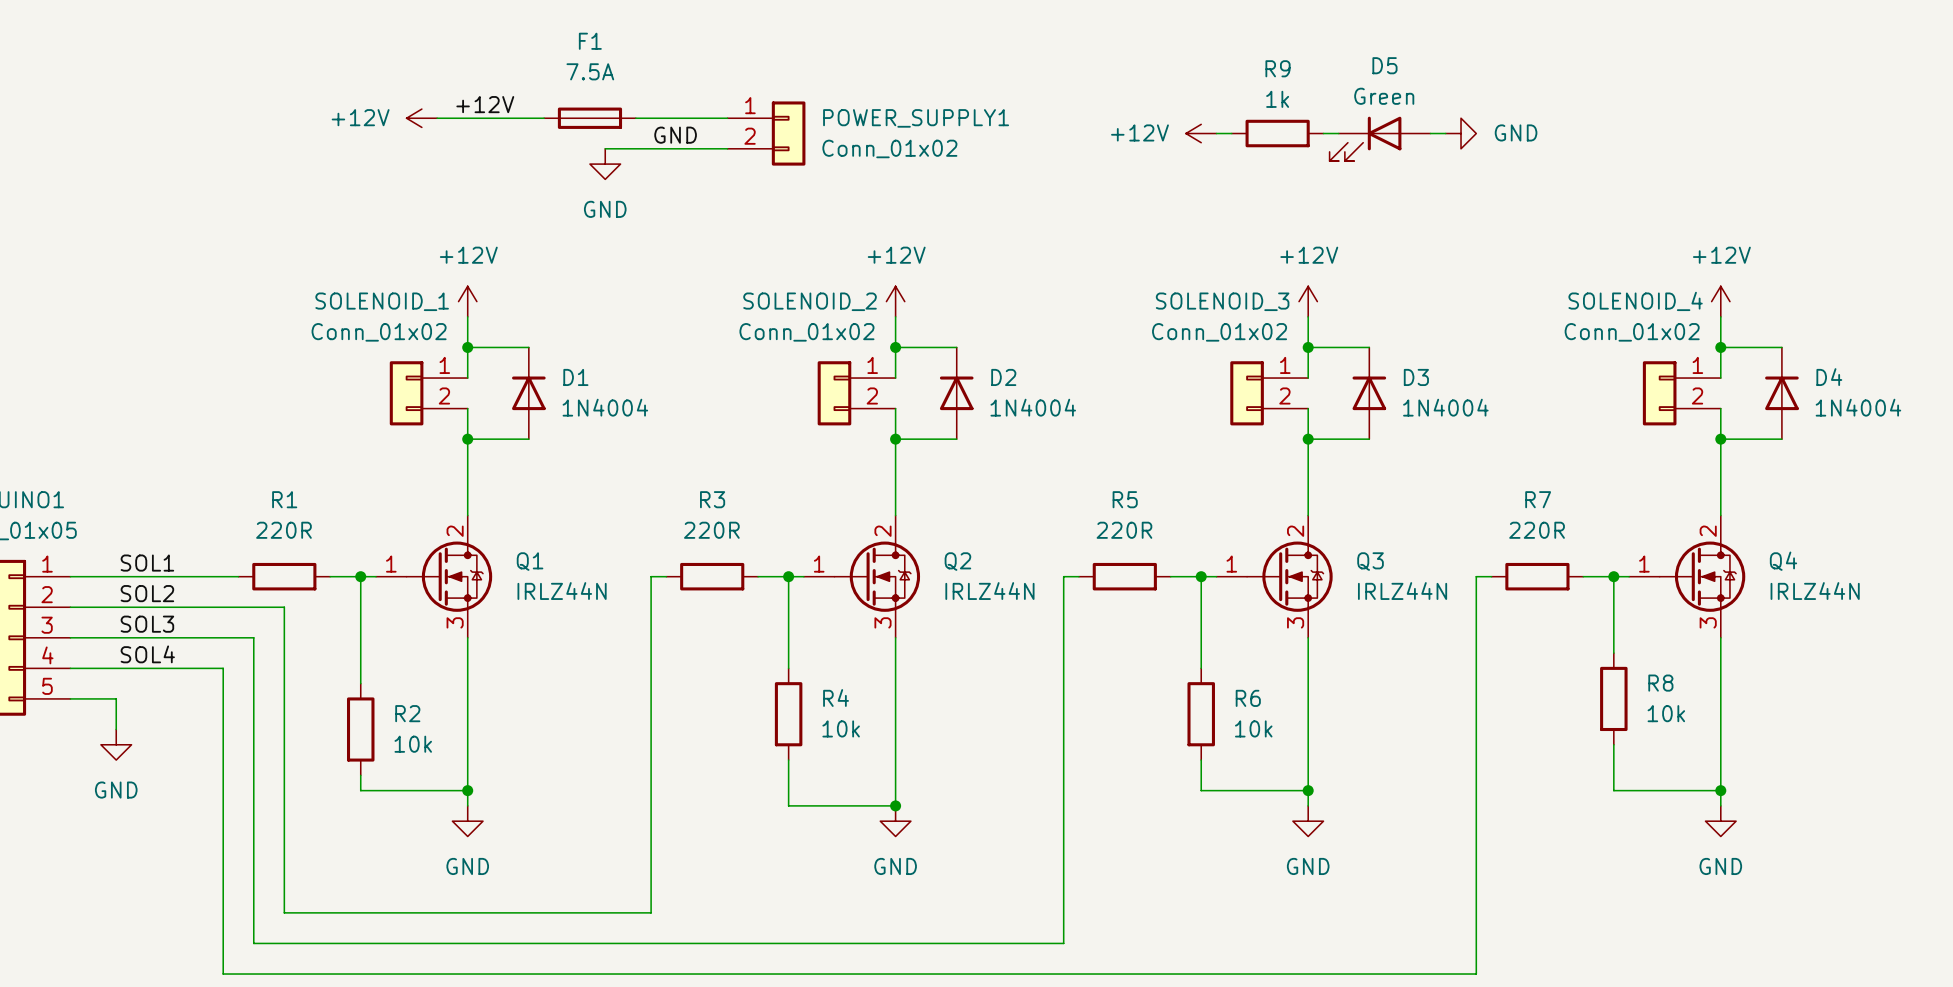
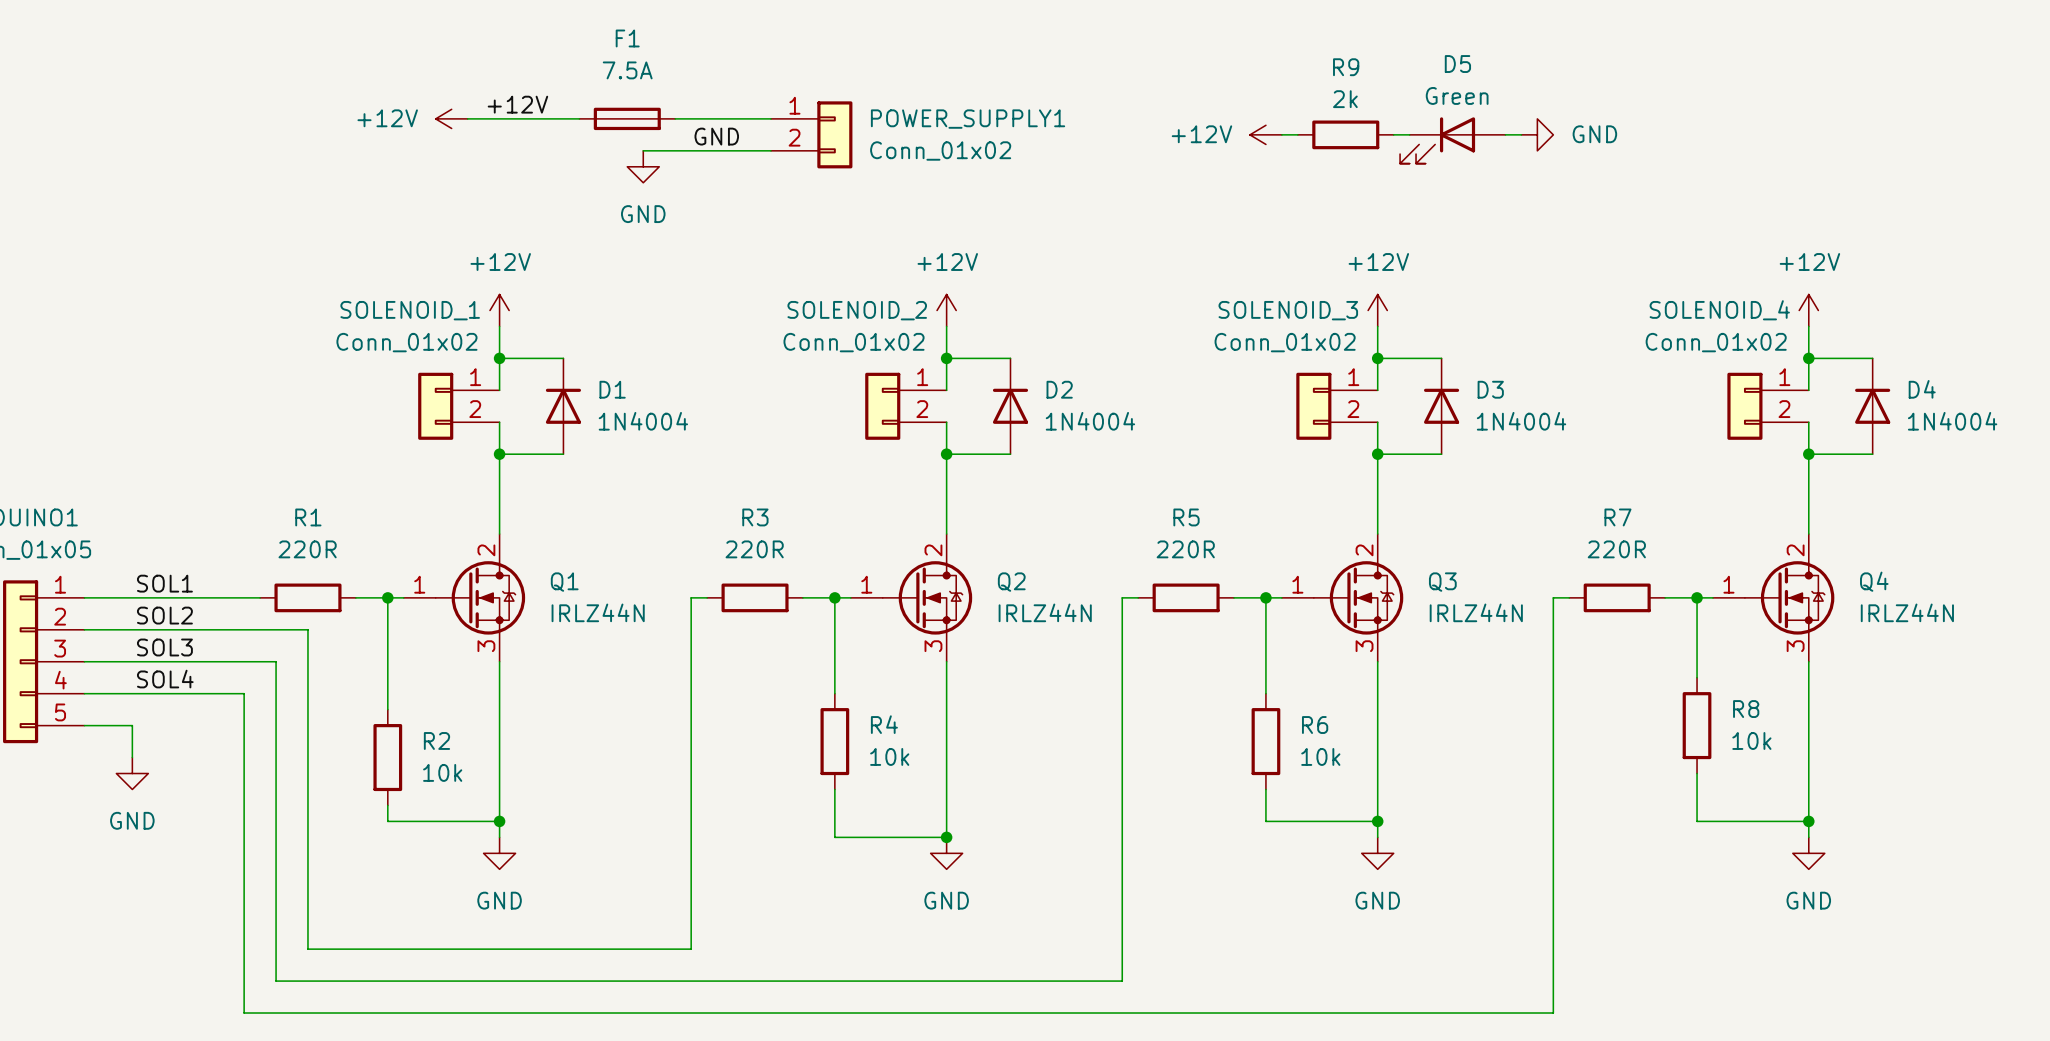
R9 value: 1k (1277, 99) -> 2k (1345, 99)

